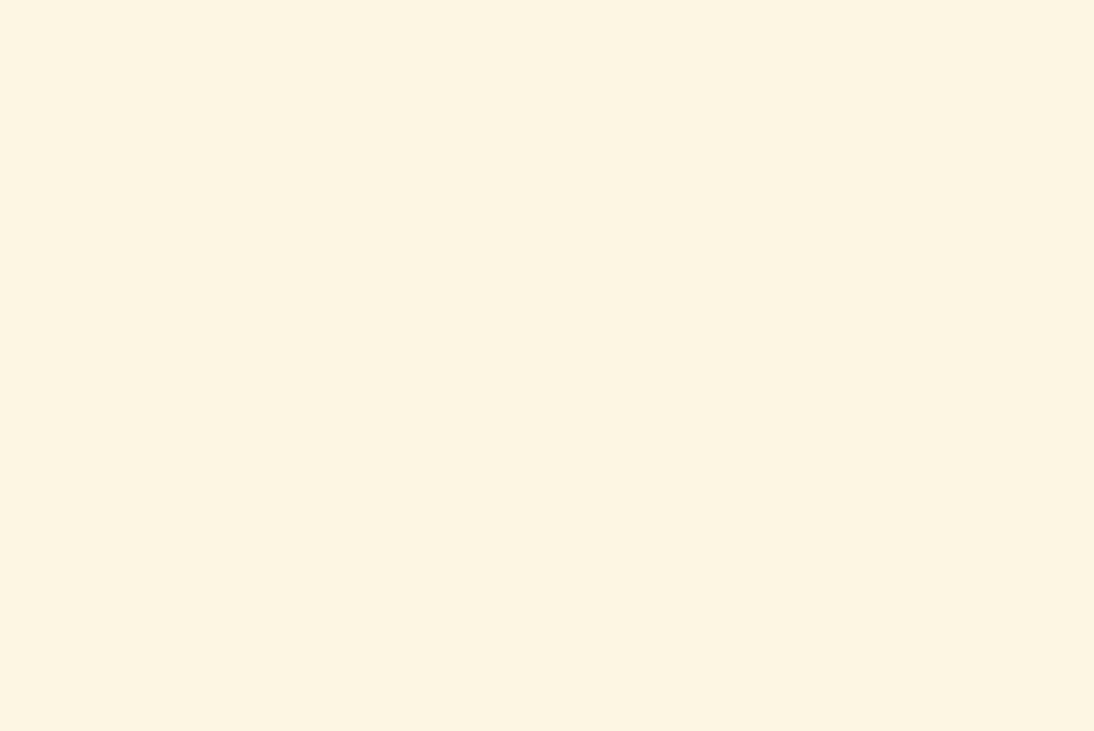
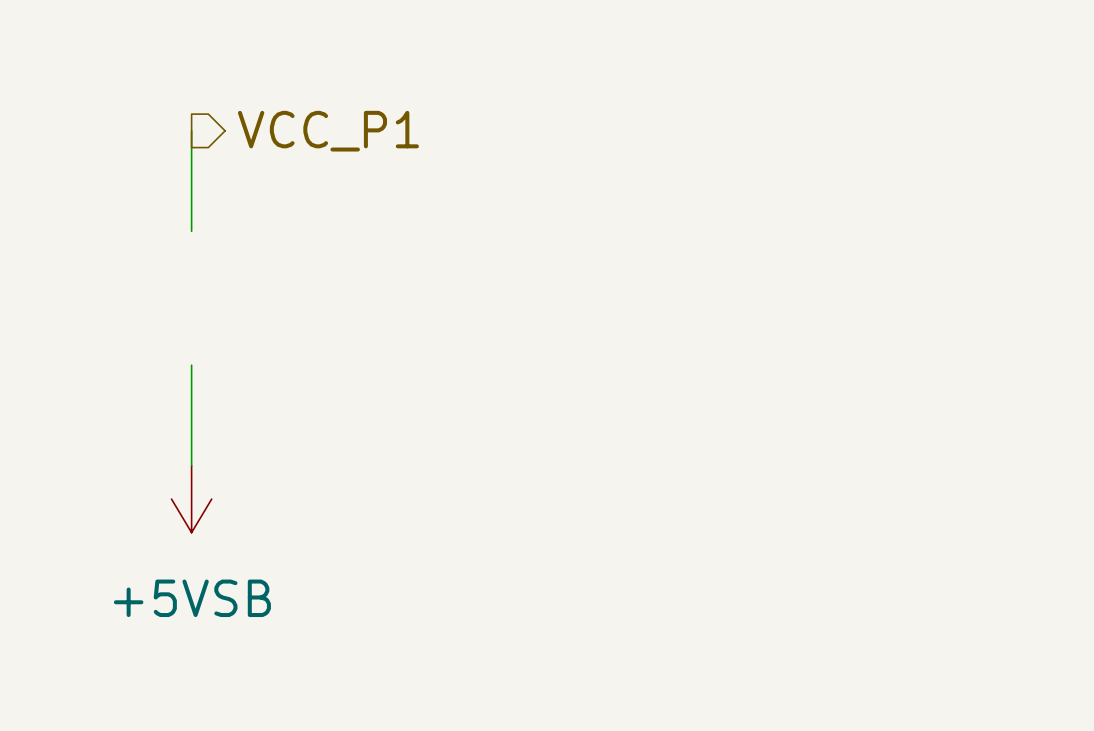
wire: none -> (191, 130) (191, 231)
hierarchical label: none -> VCC_P1 (328, 131)
wire: none -> (191, 365) (191, 465)
power symbol: none -> +5VSB (191, 499)

